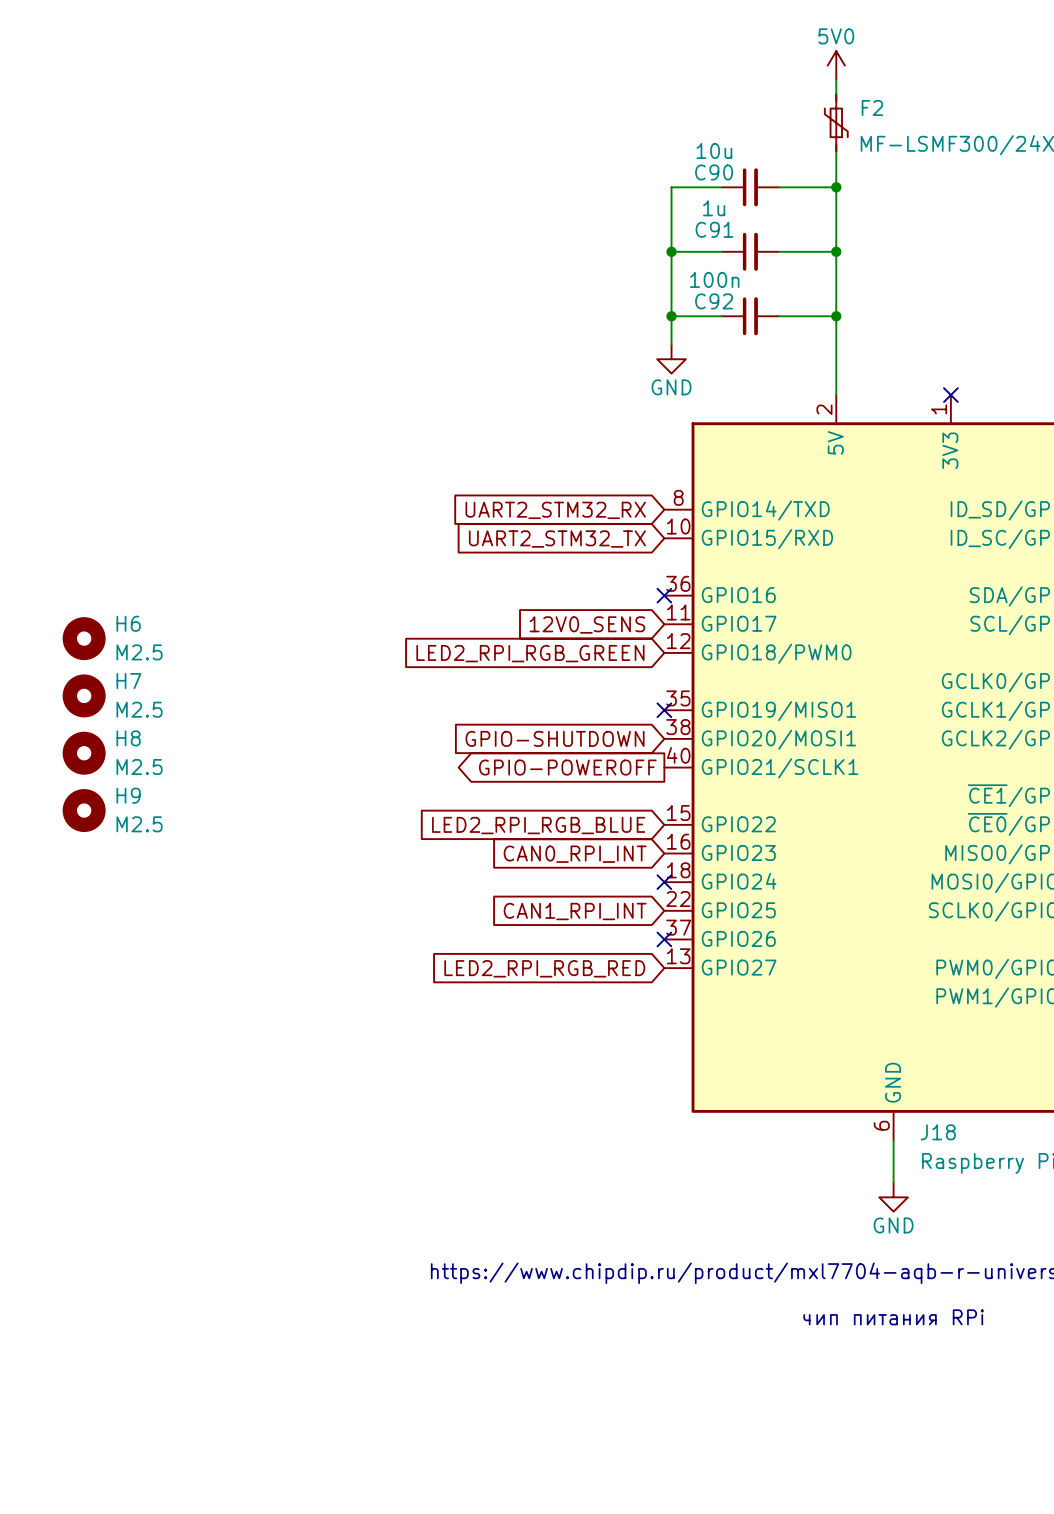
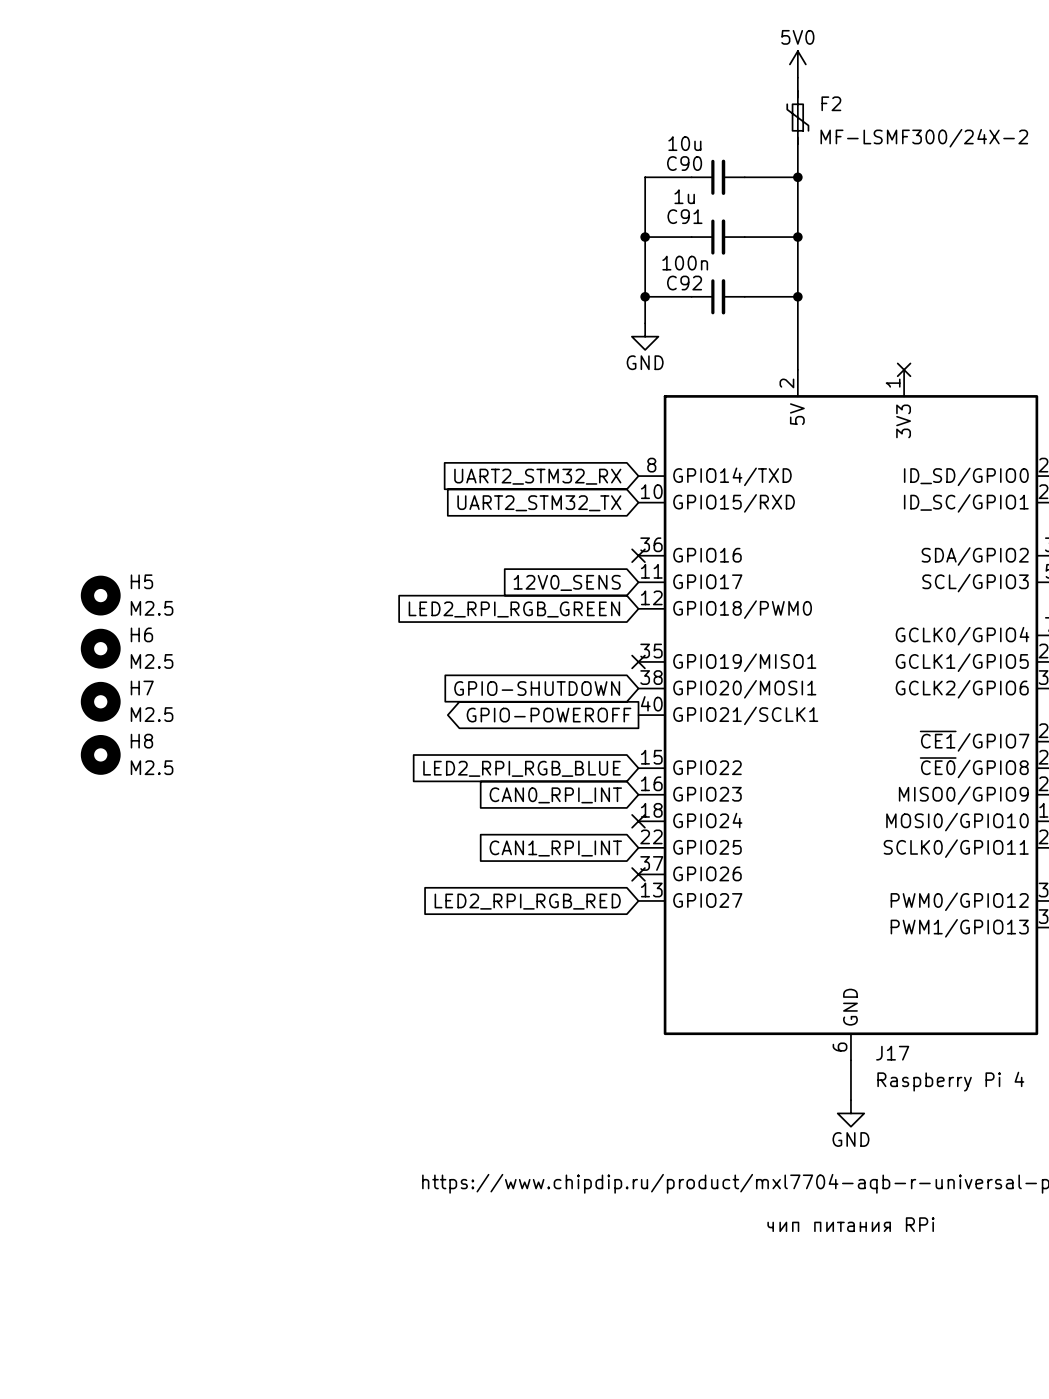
H6 name: H6 (128, 623) -> H5 (141, 581)
H7 name: H7 (128, 681) -> H6 (141, 634)
H8 name: H8 (128, 738) -> H7 (142, 688)
H9 name: H9 (128, 795) -> H8 (141, 741)
J18 name: J18 (938, 1132) -> J17 (892, 1053)

